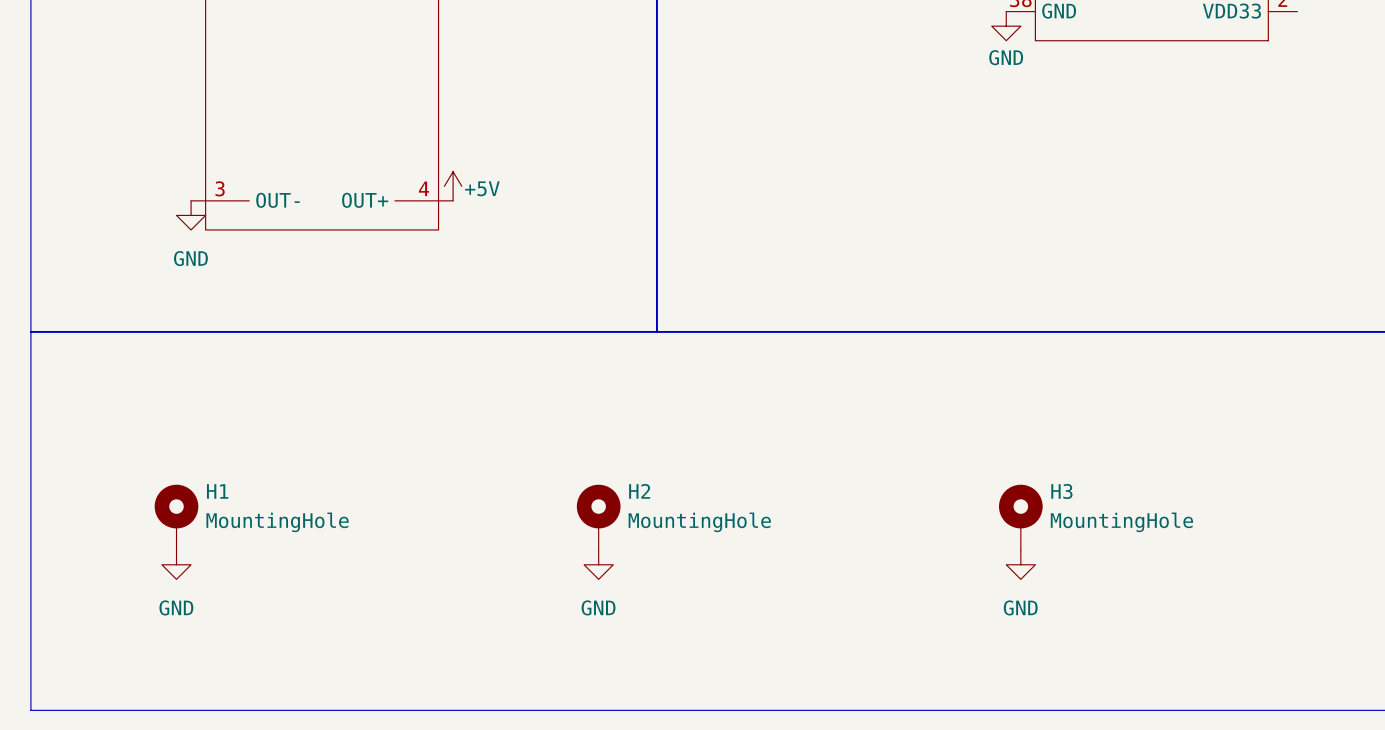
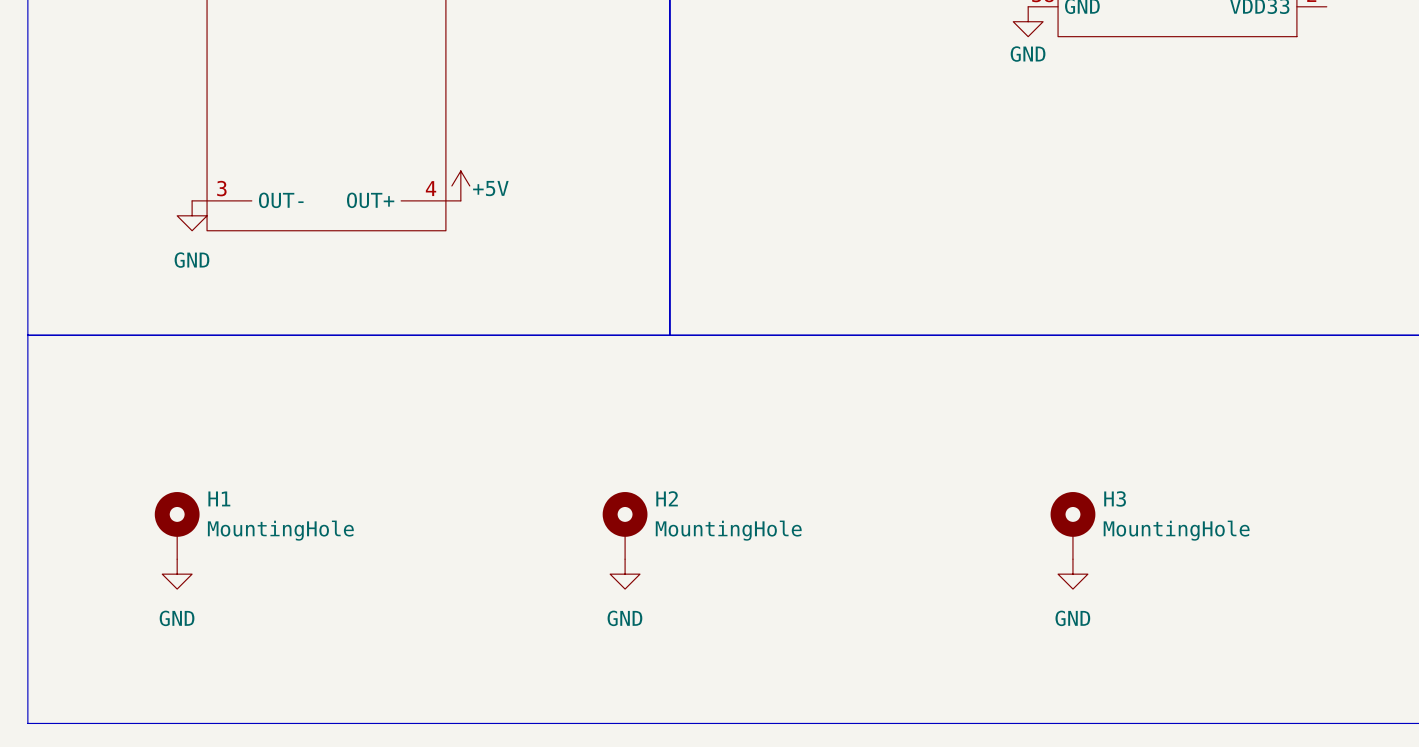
H2 position: (598, 517) -> (625, 525)
H3 position: (1020, 517) -> (1072, 525)
power symbol position: GND (598, 564) -> GND (625, 574)
power symbol position: GND (1020, 564) -> GND (1072, 574)

